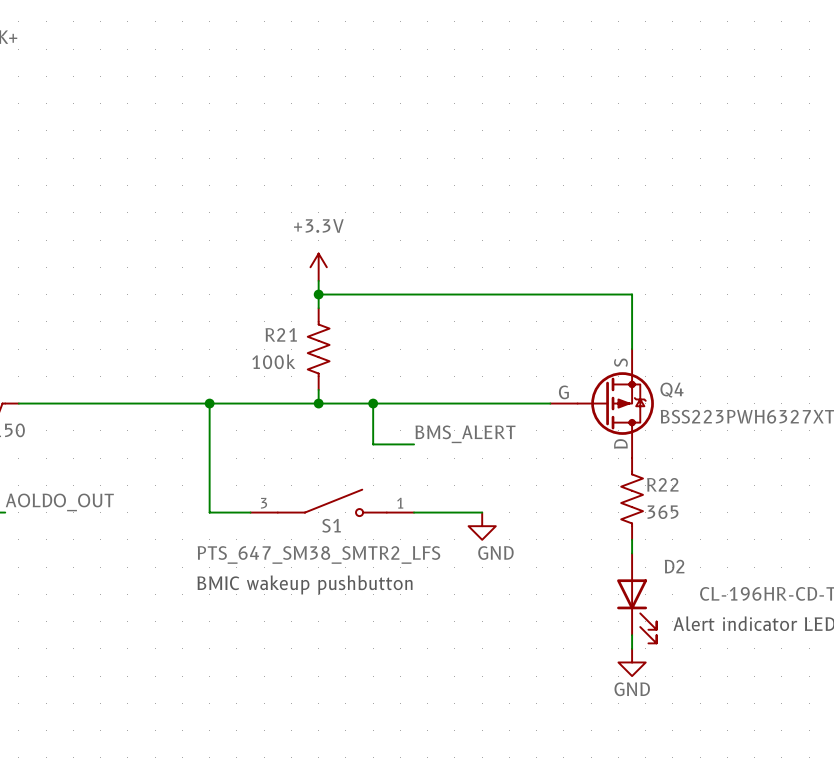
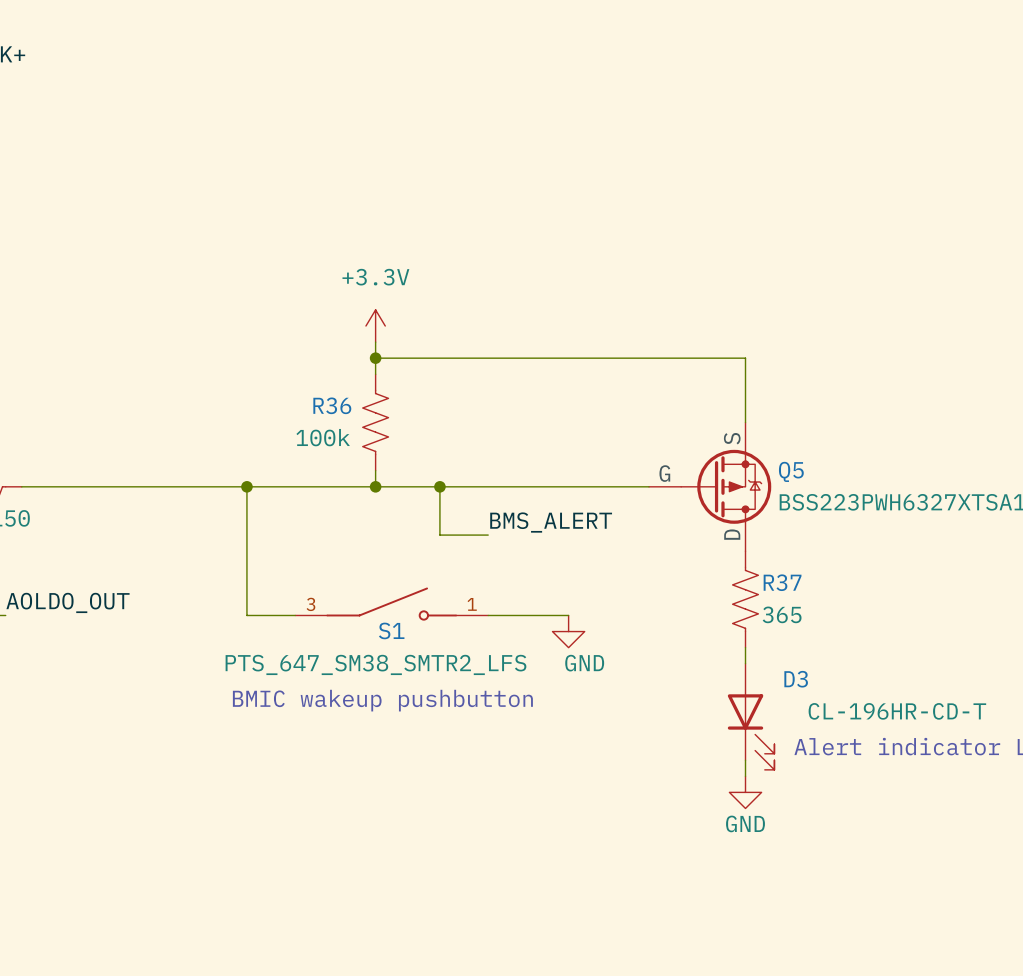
R21 name: R21 (281, 334) -> R36 (332, 405)
Q4 name: Q4 (672, 390) -> Q5 (791, 471)
R22 name: R22 (662, 484) -> R37 (782, 582)
D2 name: D2 (674, 566) -> D3 (796, 679)

